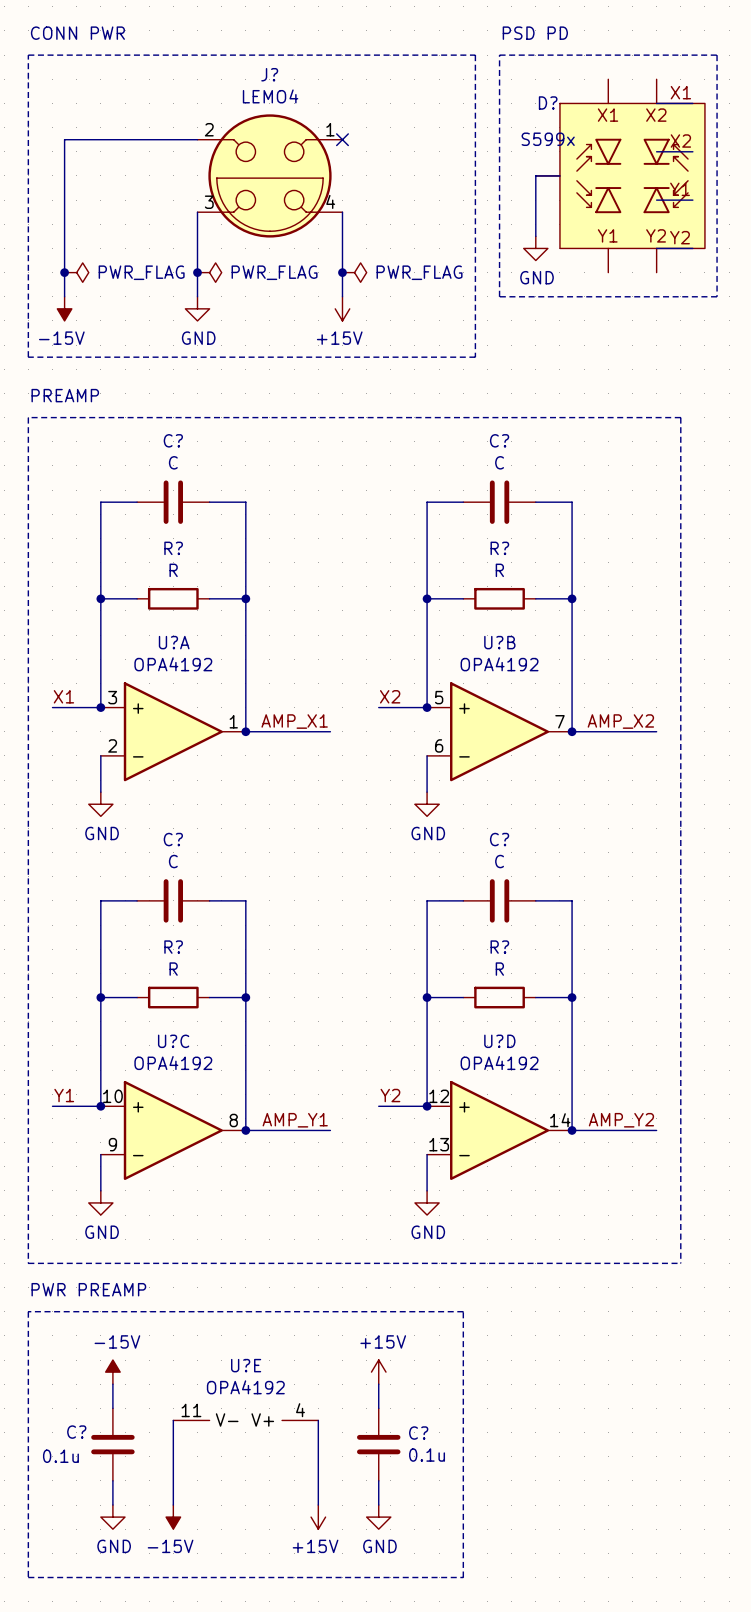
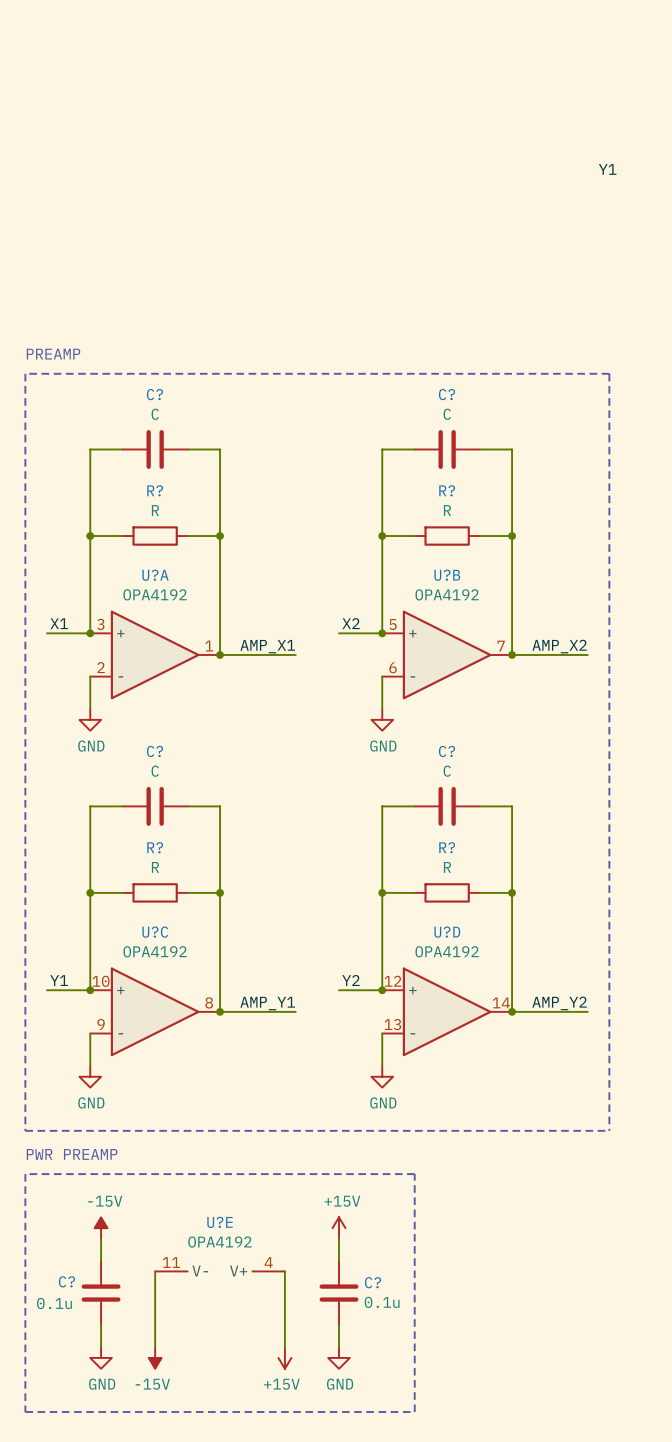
text: CONN PWR (77, 33) -> none
text: PSD PD (535, 33) -> none
line: (28, 55) (28, 357) (475, 357) (475, 55) (28, 55) -> none
line: (499, 55) (717, 55) (717, 296) (499, 296) (499, 55) -> none
label: X1 (680, 92) -> none
wire: (656, 103) (692, 103) -> none
wire: (197, 139) (64, 139) (64, 296) -> none
no-connect mark: (342, 139) -> none
label: X2 (680, 141) -> none
wire: (656, 151) (692, 151) -> none
J?: LEMO4 (269, 175) -> none
wire: (559, 175) (535, 175) (535, 236) -> none
D?: S599x (620, 175) -> none
wire: (656, 200) (692, 200) -> none
wire: (197, 212) (197, 296) -> none
wire: (342, 212) (342, 296) -> none
label: Y2 (680, 237) -> none
power symbol: GND (535, 248) -> none
wire: (656, 248) (692, 248) -> none
junction: (64, 272) -> none
power symbol: PWR_FLAG (76, 272) -> none
junction: (197, 272) -> none
power symbol: PWR_FLAG (209, 272) -> none
junction: (342, 272) -> none
power symbol: PWR_FLAG (354, 272) -> none
power symbol: -15V (64, 308) -> none
power symbol: GND (197, 308) -> none
power symbol: +15V (342, 308) -> none

